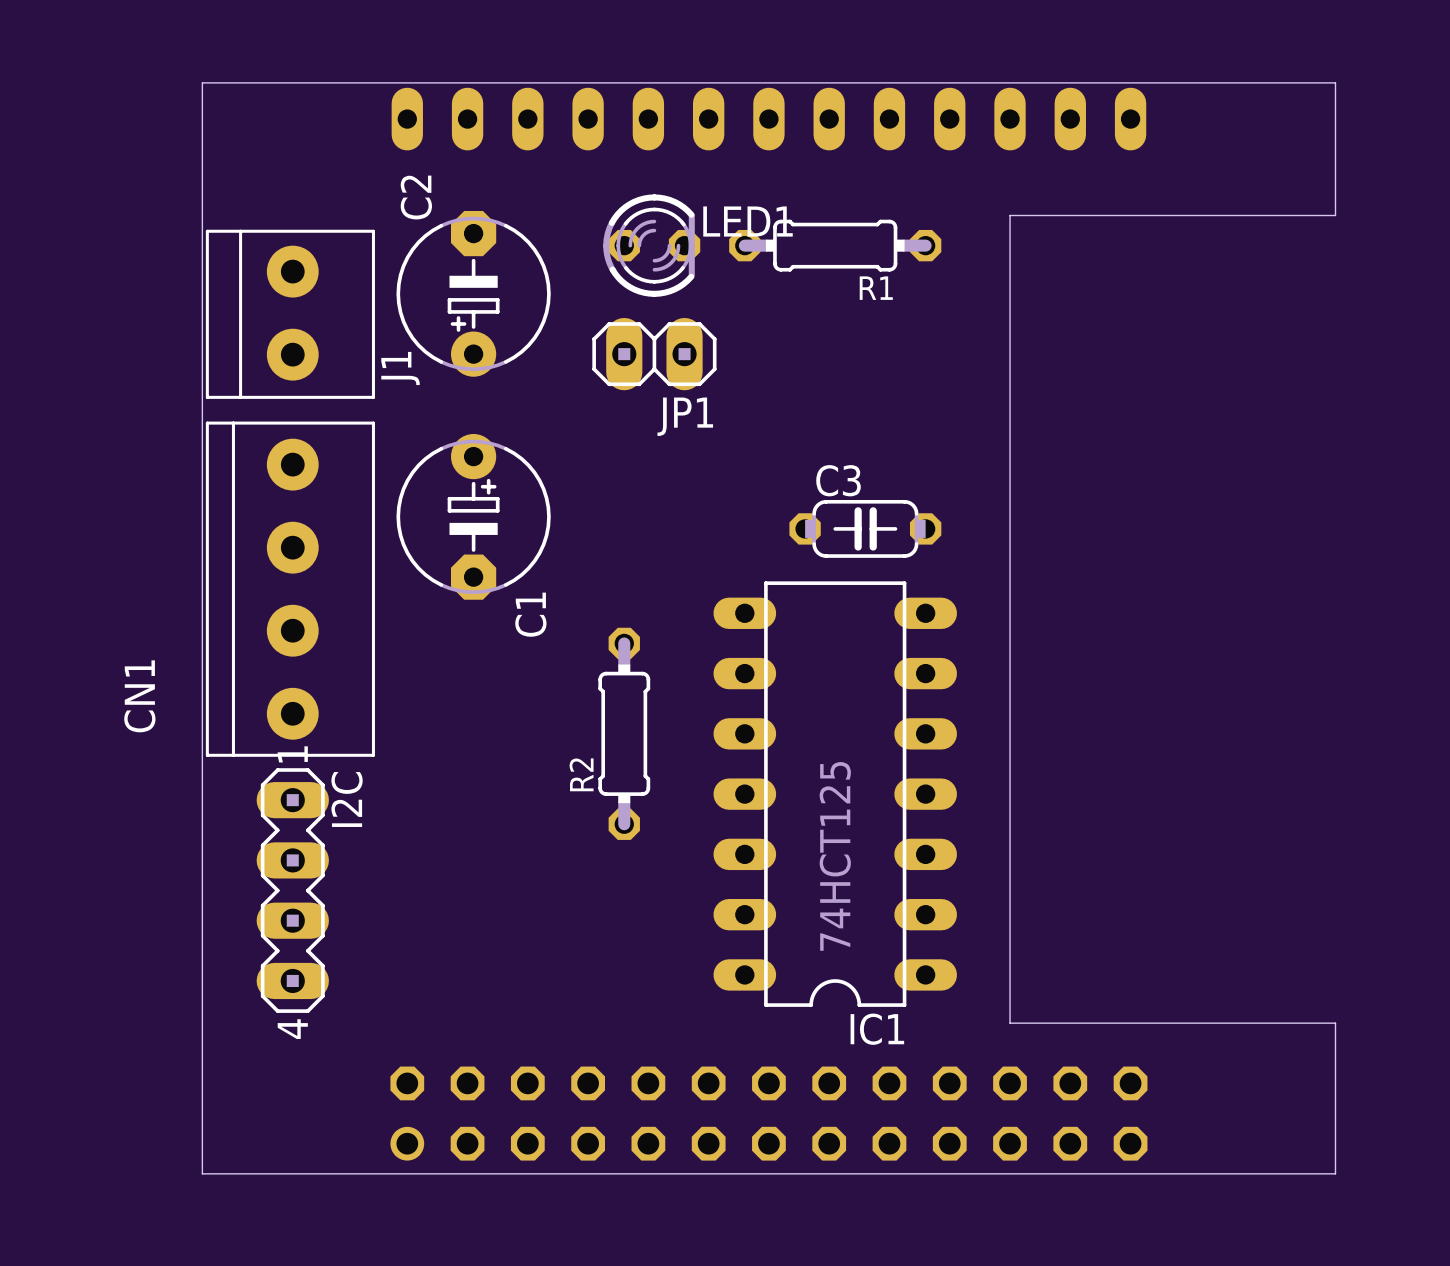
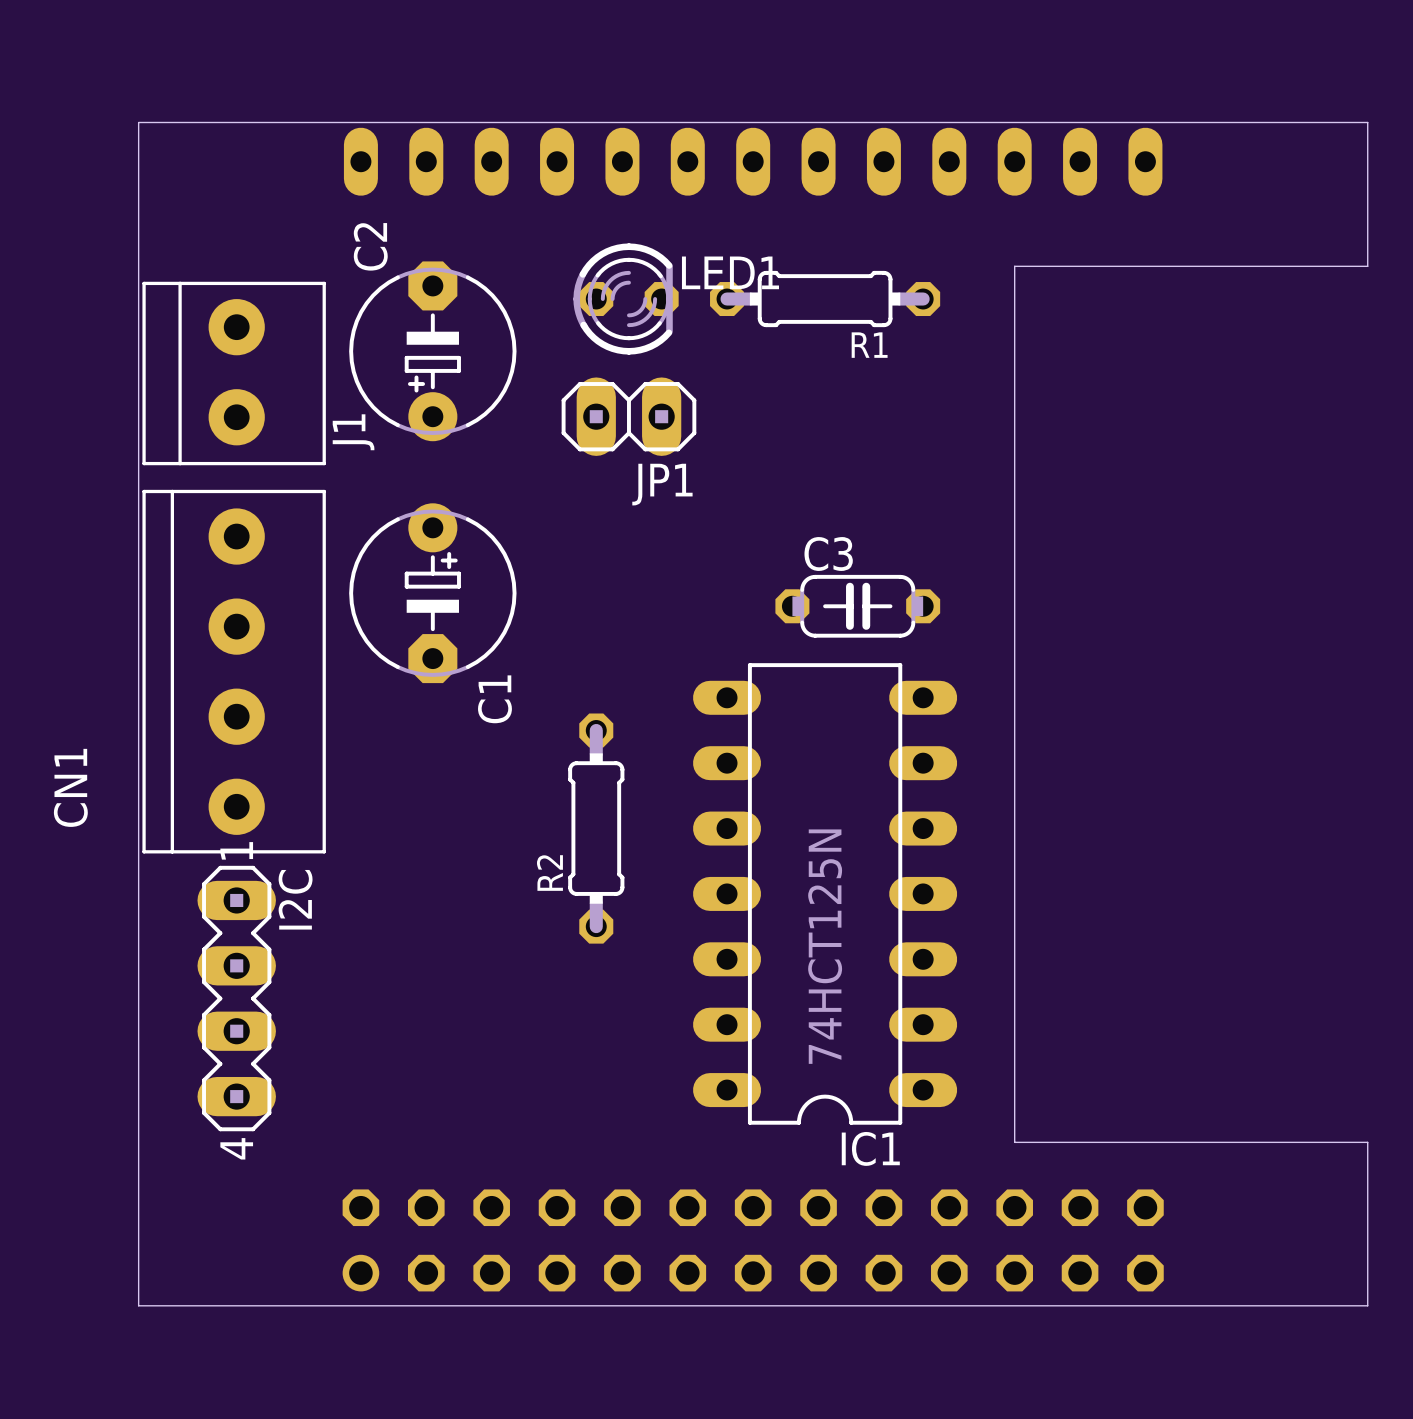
IC1 value: 74HCT125 (835, 856) -> 74HCT125N (825, 946)

